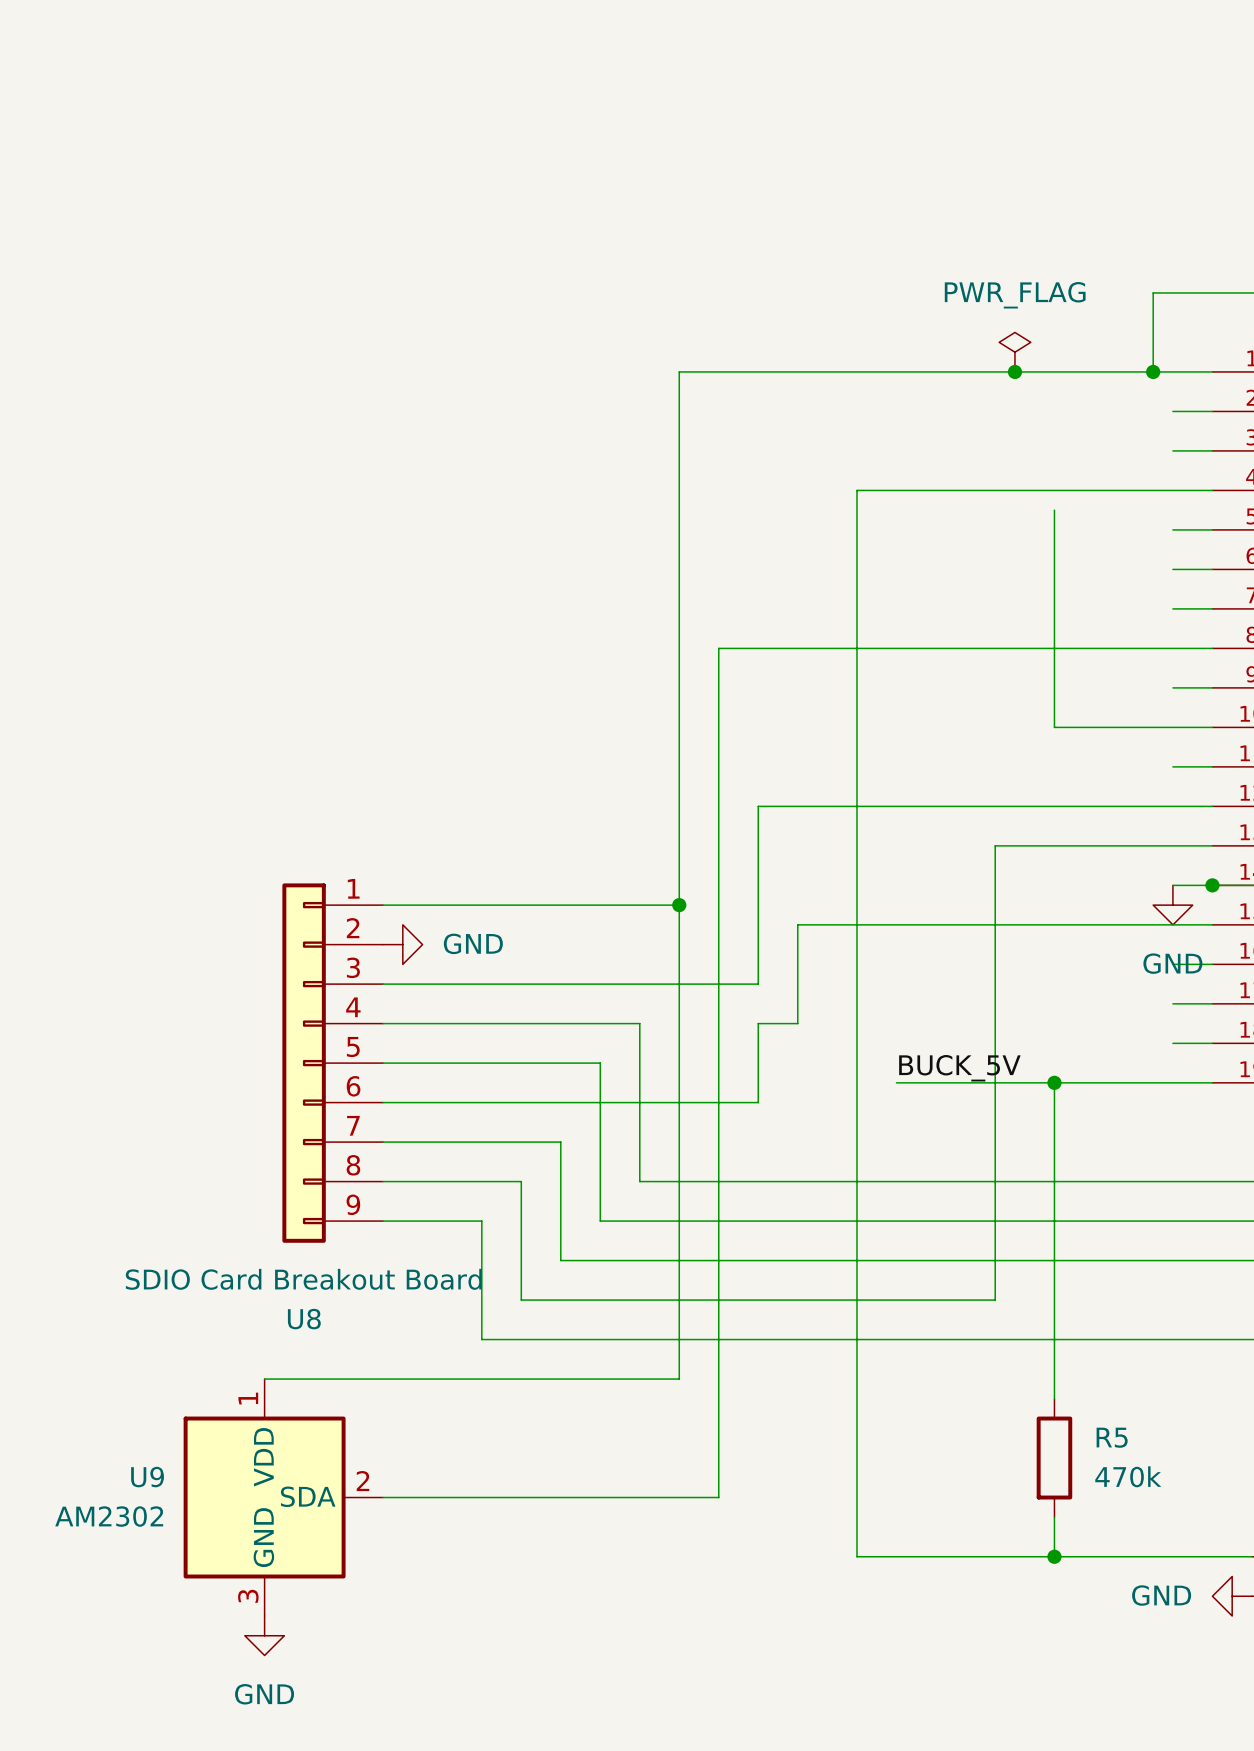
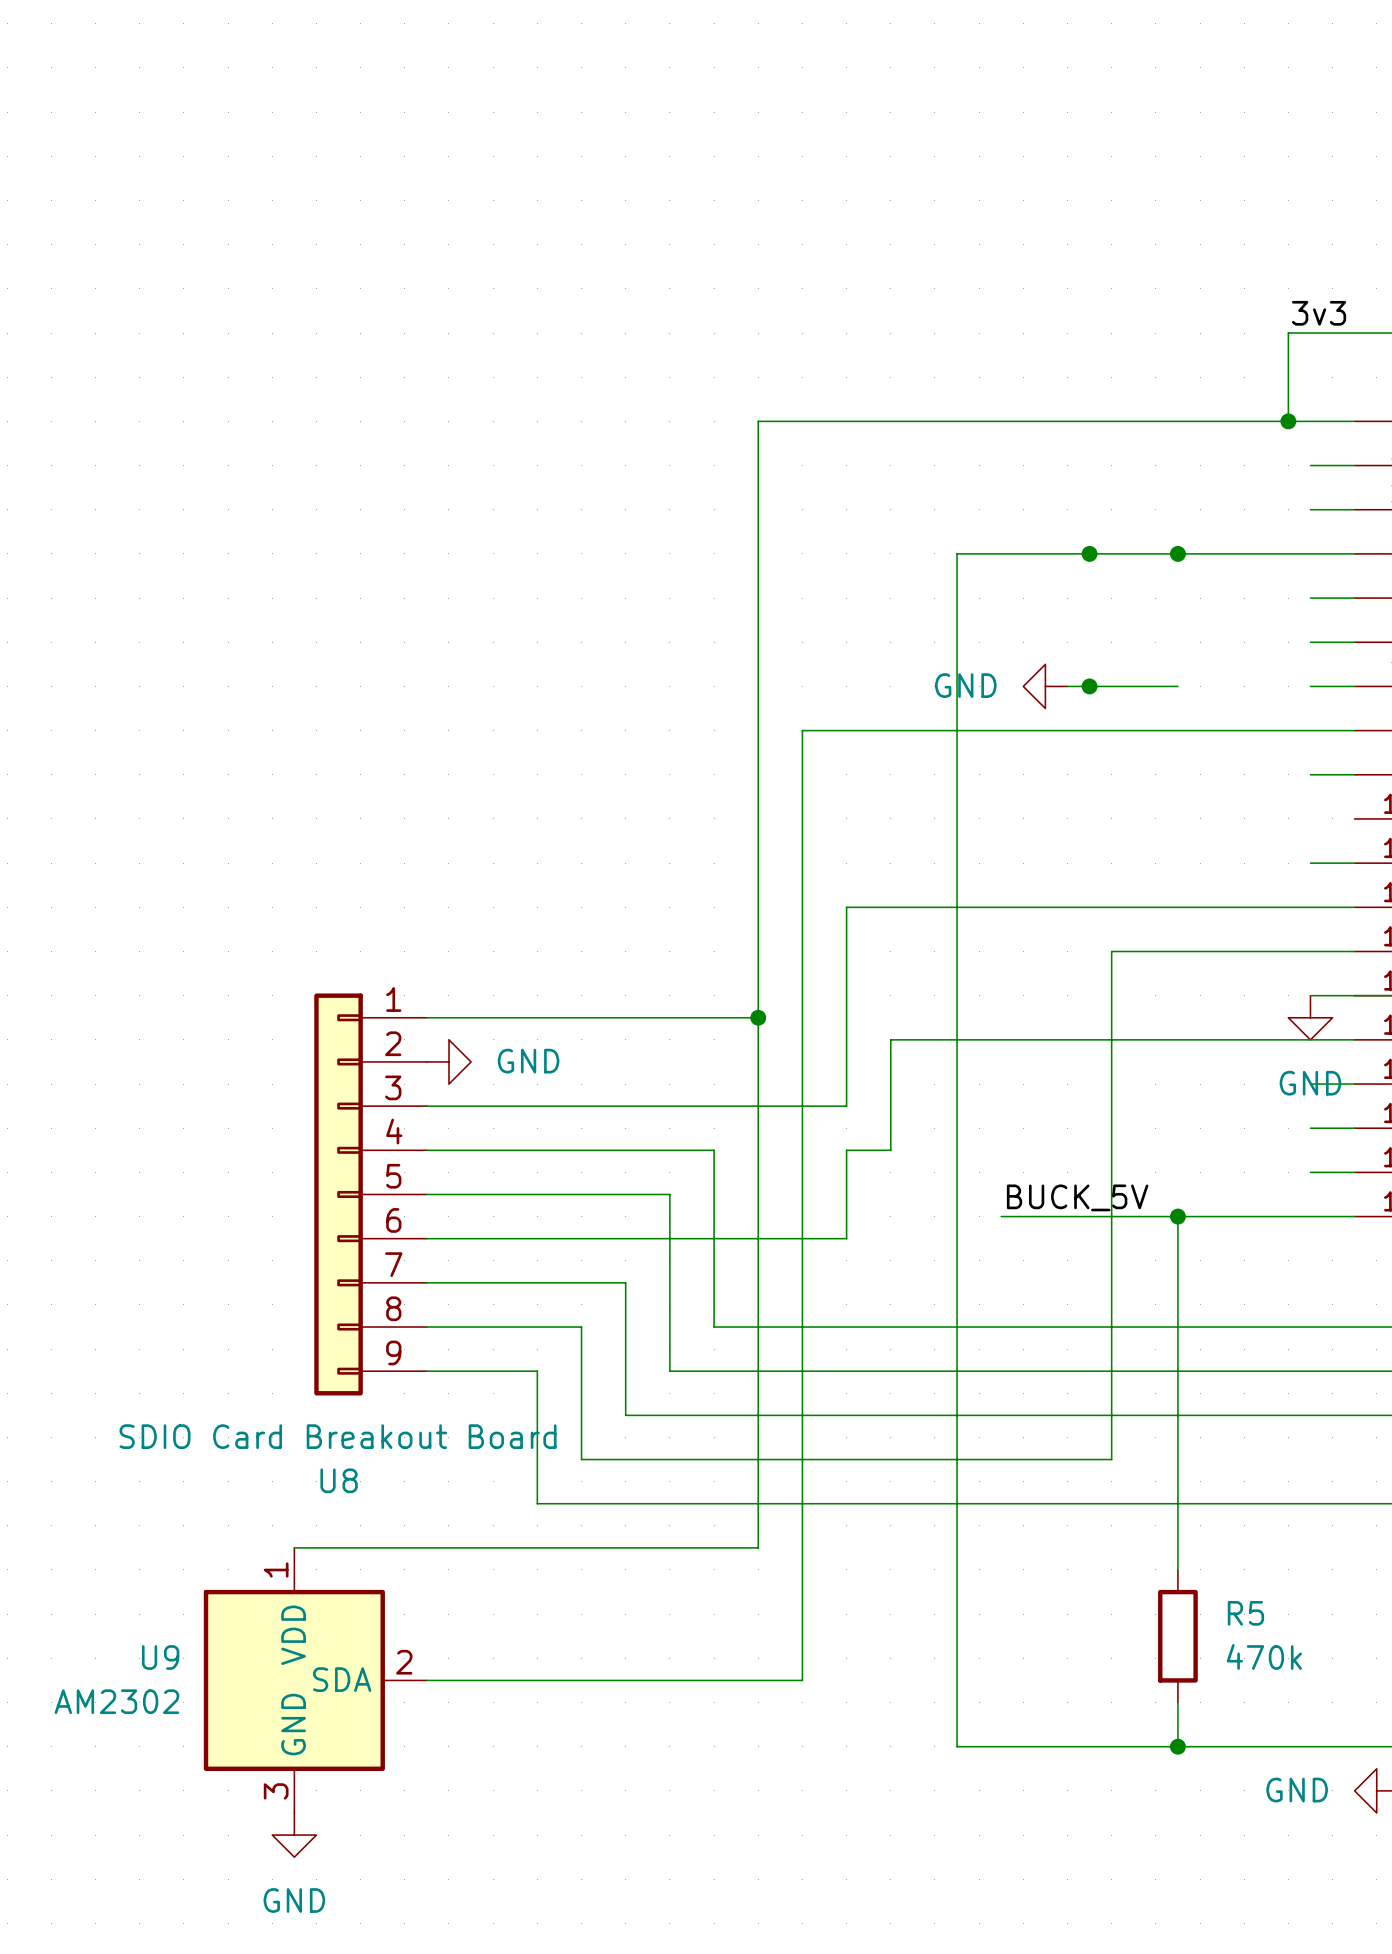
label: none -> 3v3 (1319, 313)
power symbol: PWR_FLAG (1014, 352) -> none
junction: (1014, 371) -> none
junction: none -> (1089, 553)
junction: none -> (1177, 553)
wire: (1054, 510) (1054, 727) (1212, 727) -> none
power symbol: none -> GND (1045, 686)
wire: none -> (1067, 686) (1177, 686)
junction: none -> (1089, 686)
junction: (1212, 885) -> none

